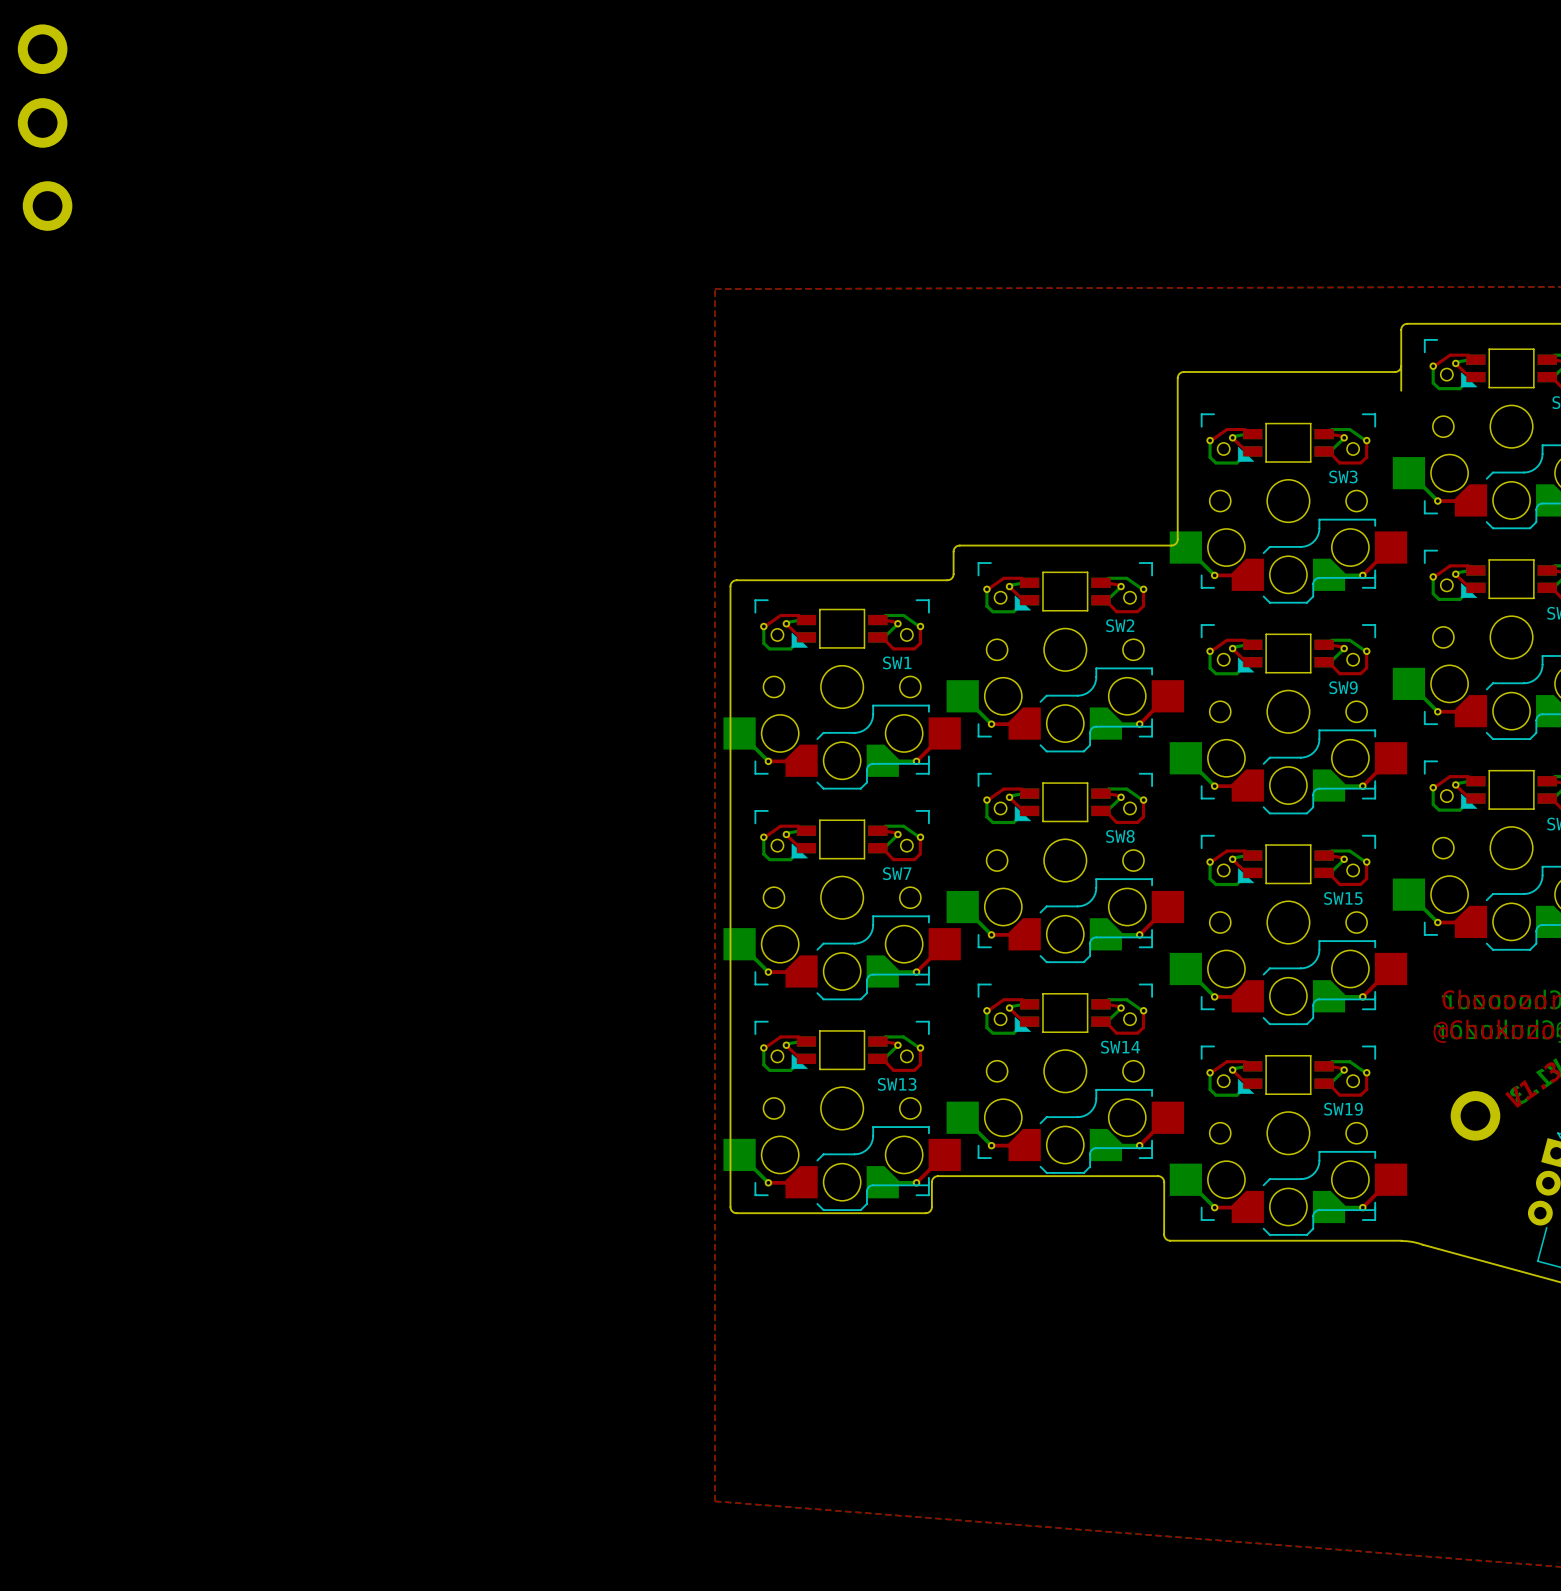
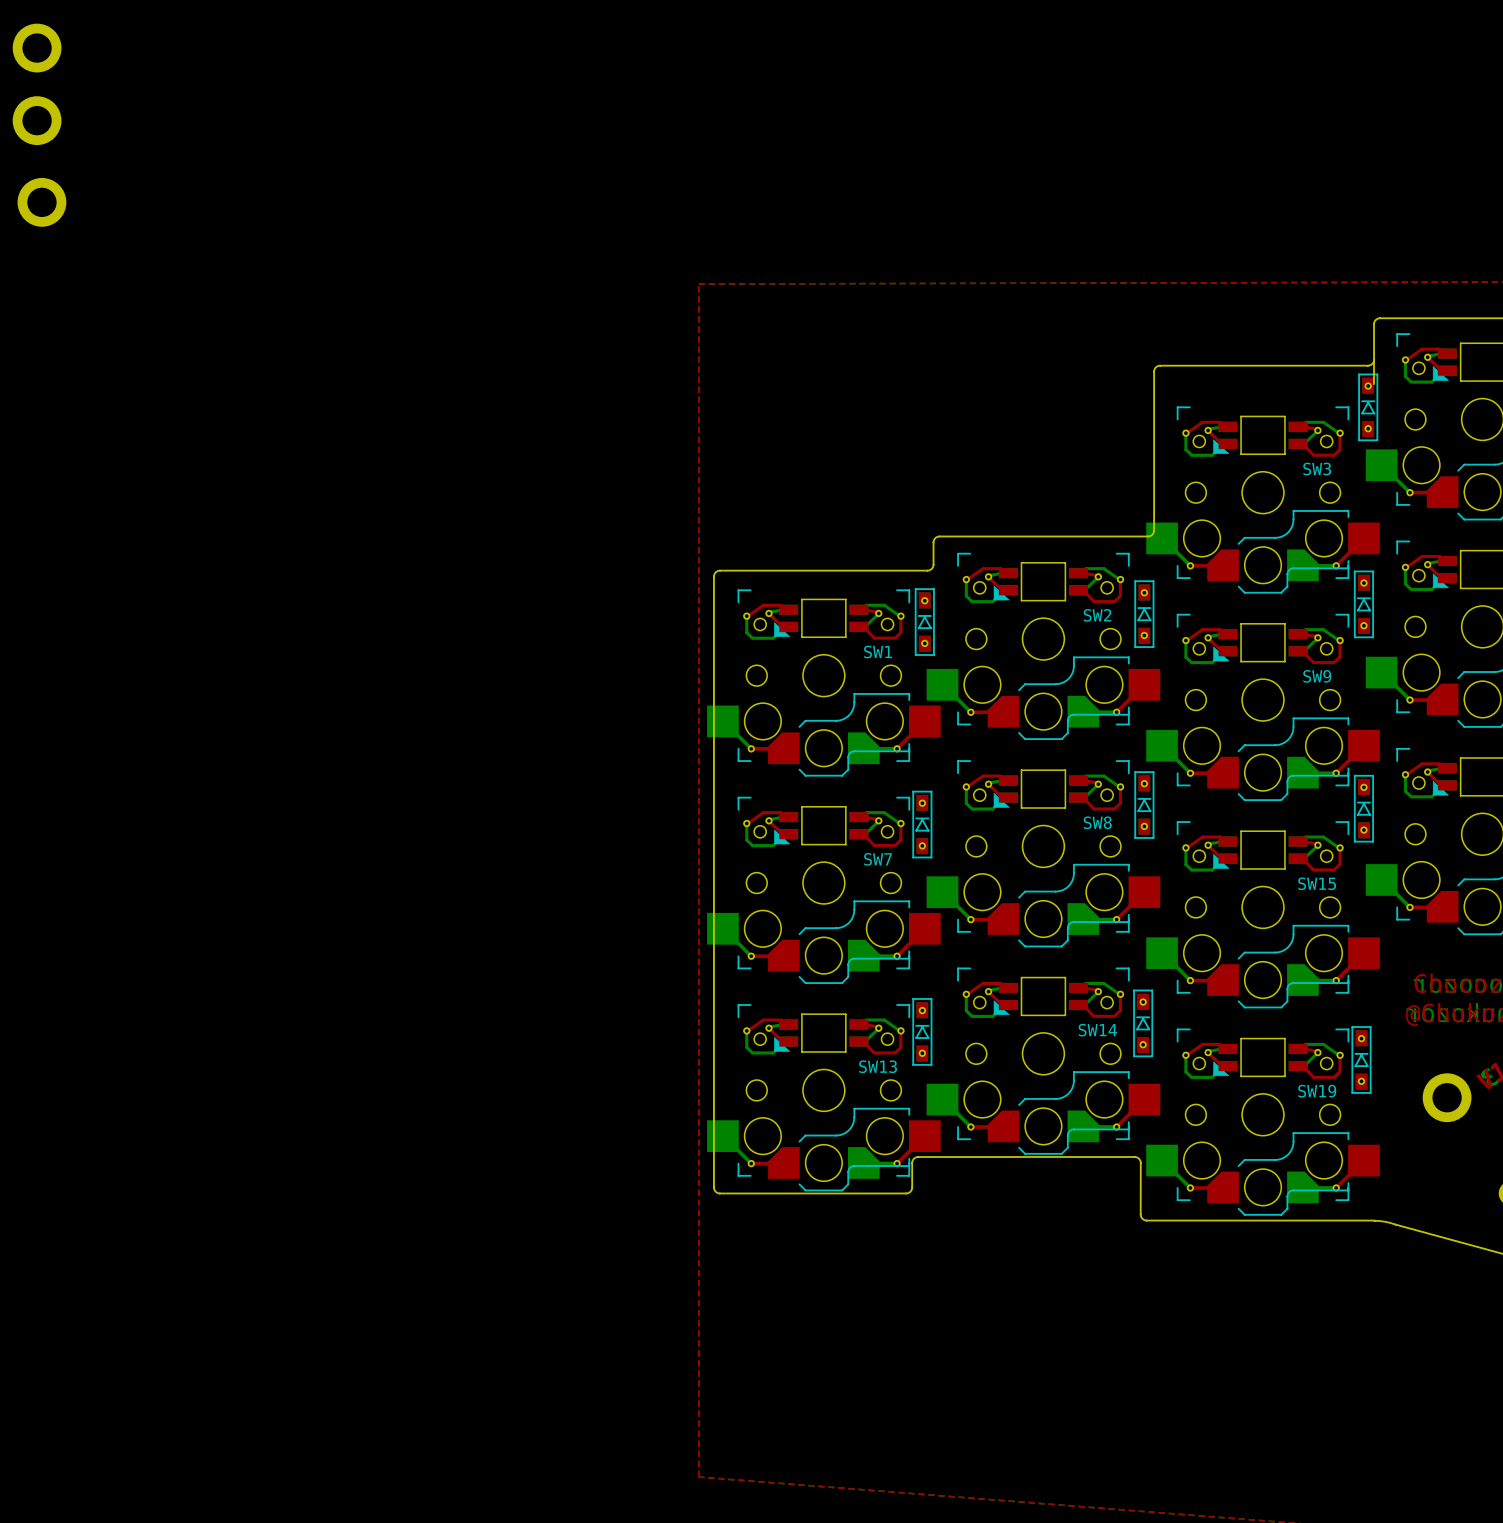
part: none -> (1368, 407)
part: none -> (1363, 604)
part: none -> (1144, 614)
part: none -> (924, 622)
part: none -> (1144, 805)
part: none -> (1363, 808)
part: none -> (922, 824)
part: none -> (1143, 1023)
part: none -> (922, 1031)
part: none -> (1361, 1059)

